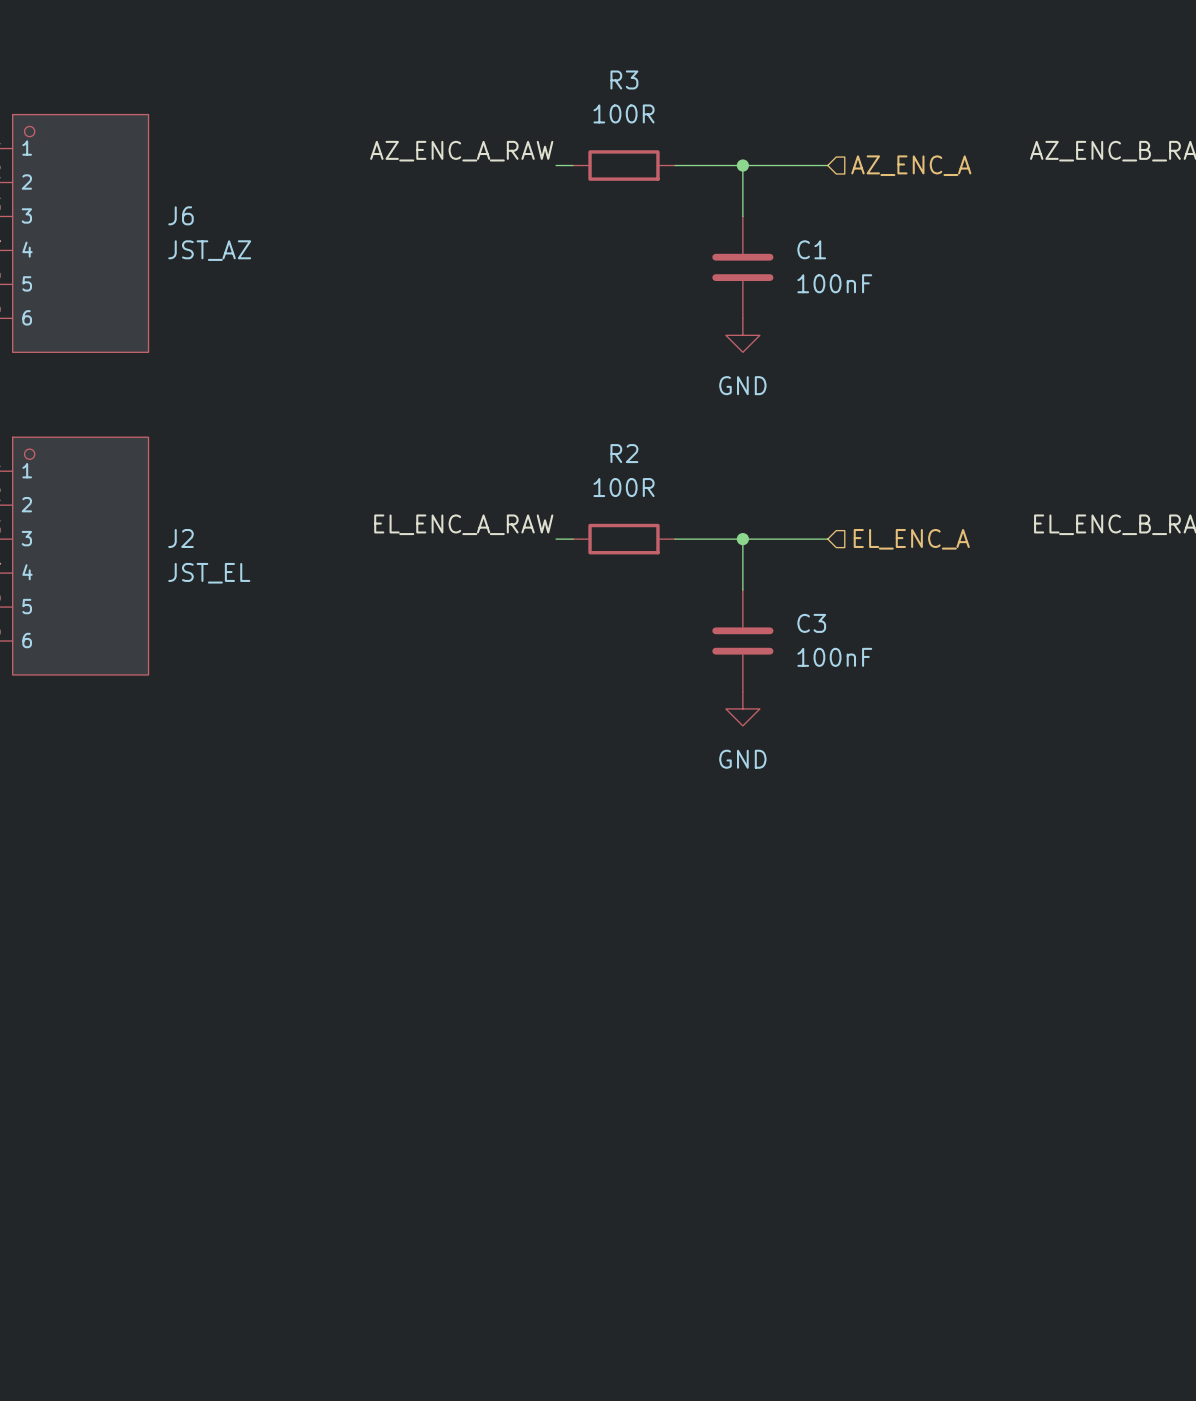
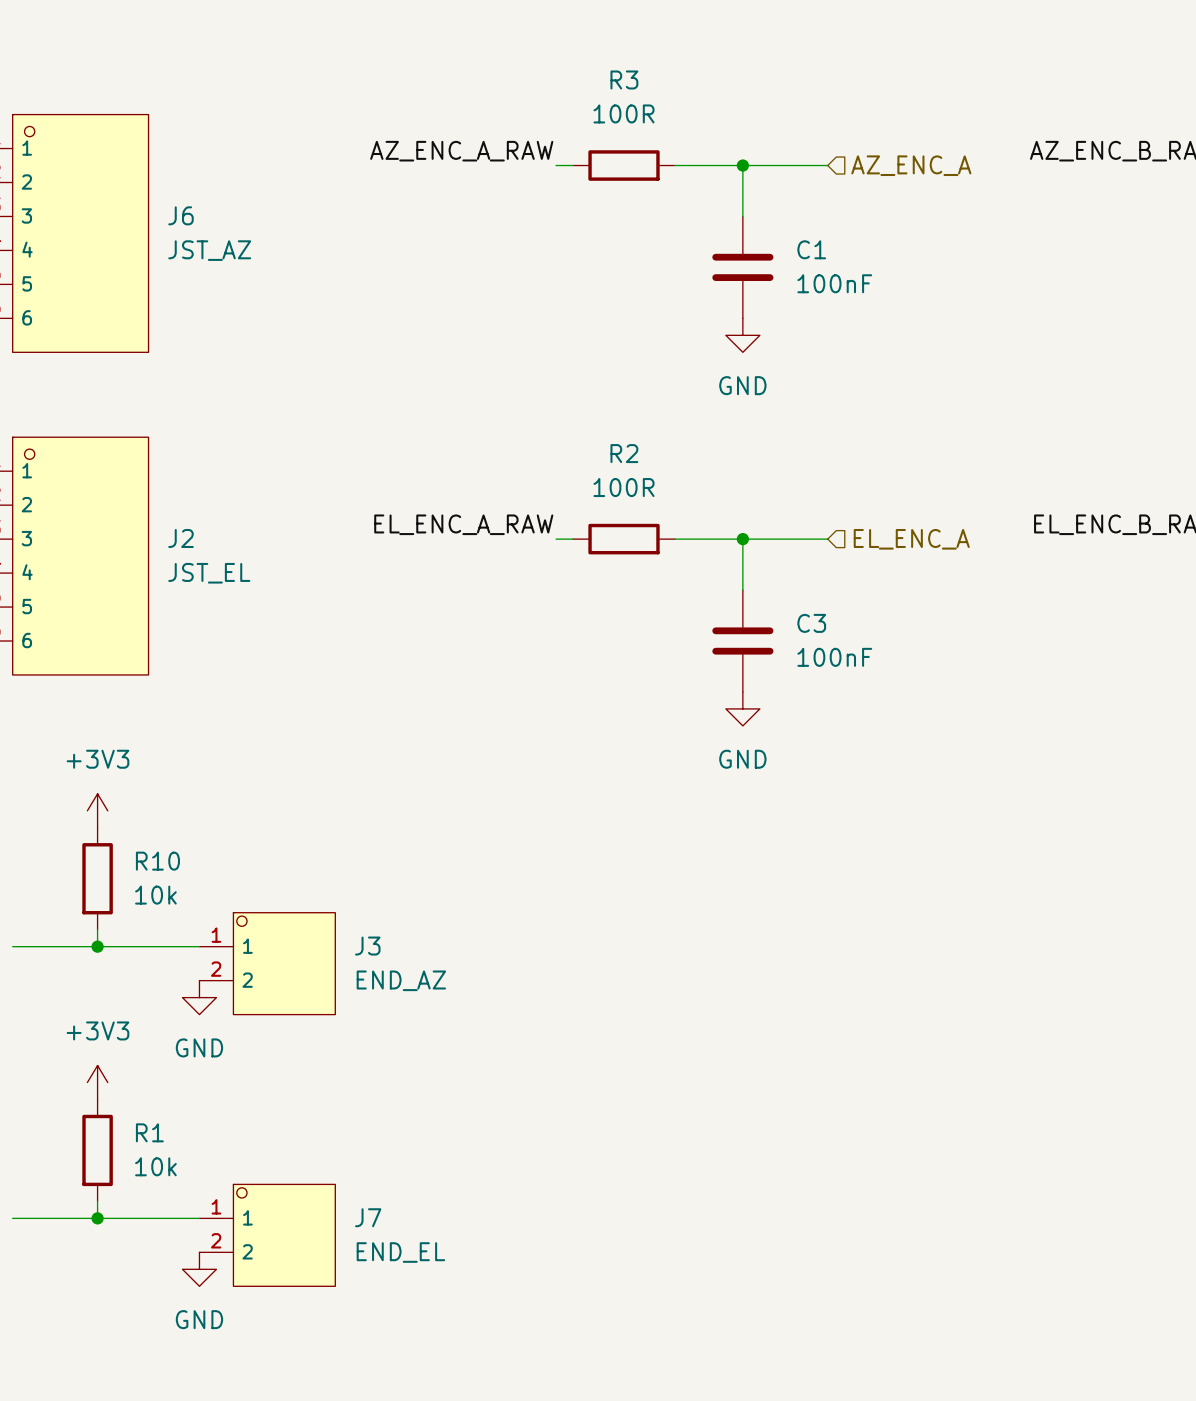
power symbol: none -> +3V3 (97, 810)
R10: none -> 10k (97, 878)
wire: none -> (97, 929) (97, 946)
wire: none -> (12, 946) (199, 946)
junction: none -> (97, 946)
J3: none -> END_AZ (267, 963)
power symbol: none -> GND (199, 997)
power symbol: none -> +3V3 (97, 1082)
R1: none -> 10k (97, 1150)
wire: none -> (97, 1201) (97, 1218)
wire: none -> (12, 1218) (199, 1218)
junction: none -> (97, 1218)
J7: none -> END_EL (267, 1235)
power symbol: none -> GND (199, 1269)

